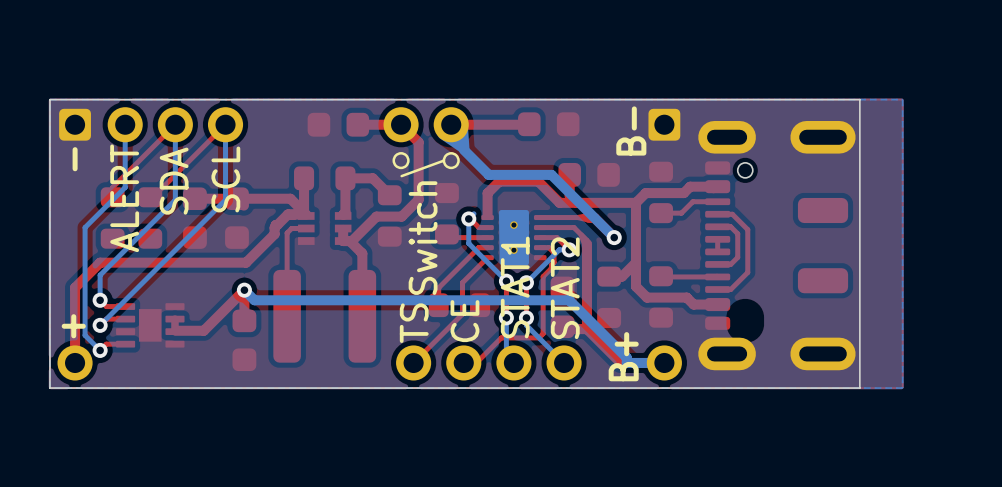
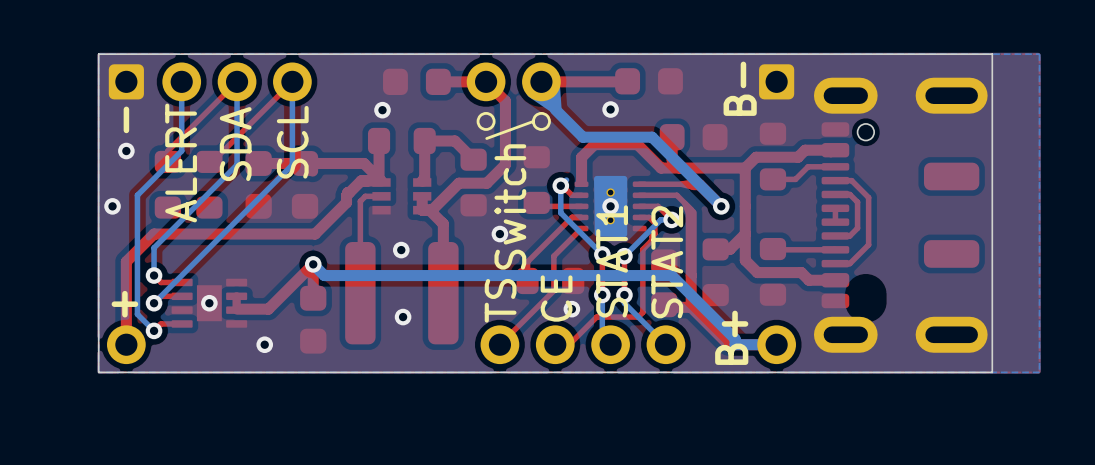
via: none -> (610, 109)
via: none -> (382, 110)
via: none -> (126, 151)
via: none -> (112, 206)
via: none -> (610, 206)
via: none -> (499, 234)
via: none -> (401, 250)
via: none -> (209, 303)
via: none -> (571, 309)
via: none -> (403, 317)
via: none -> (264, 344)

